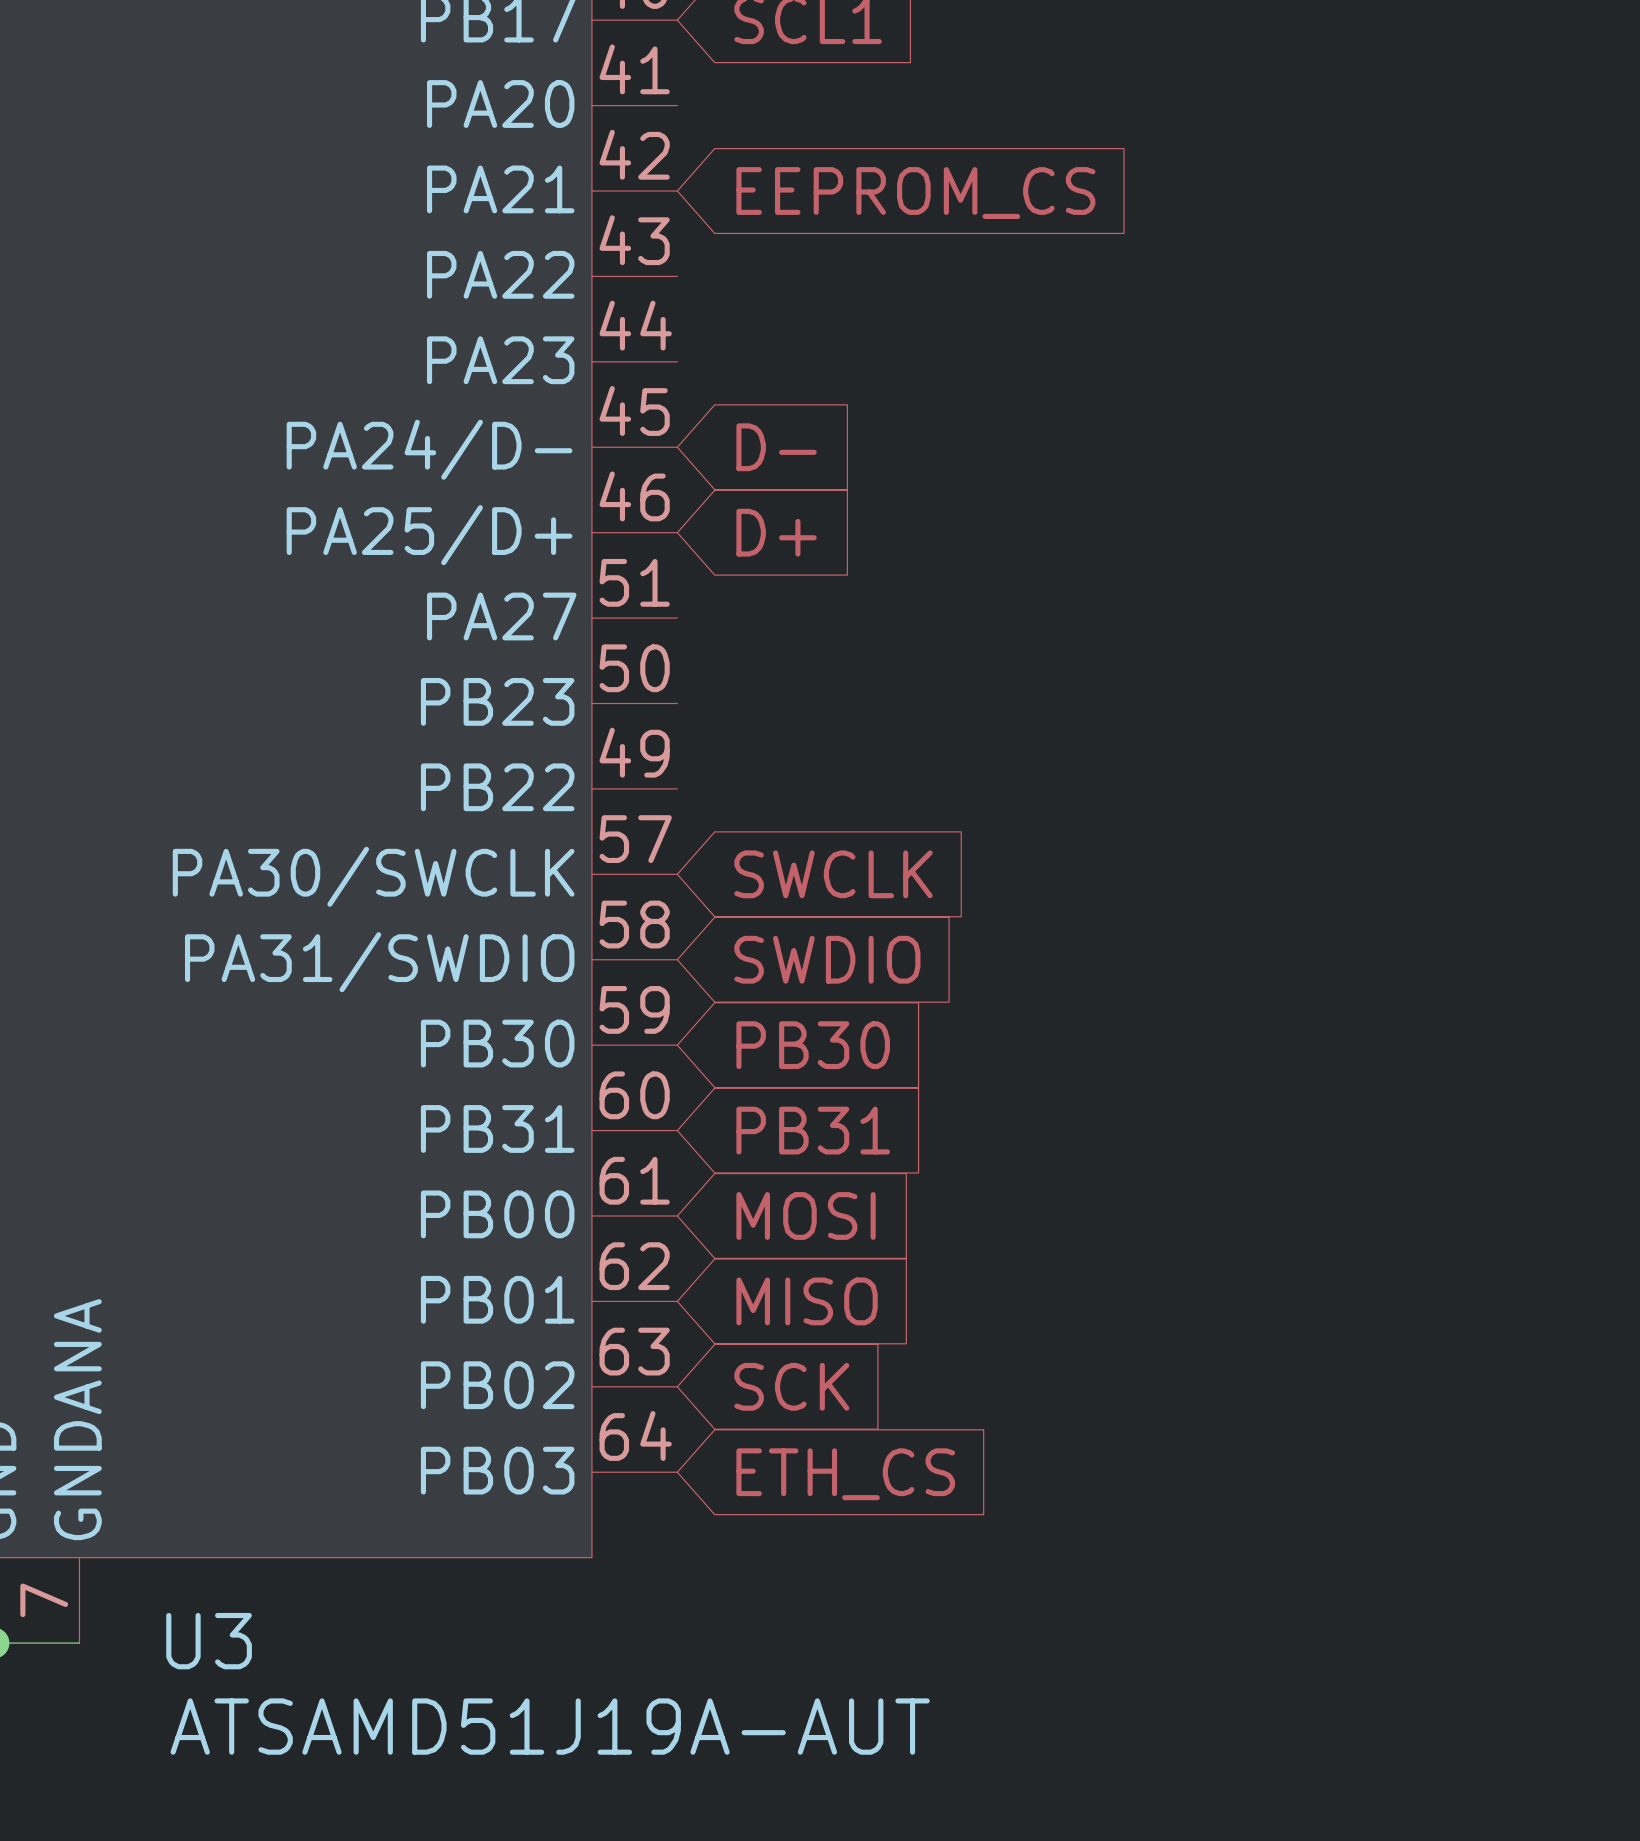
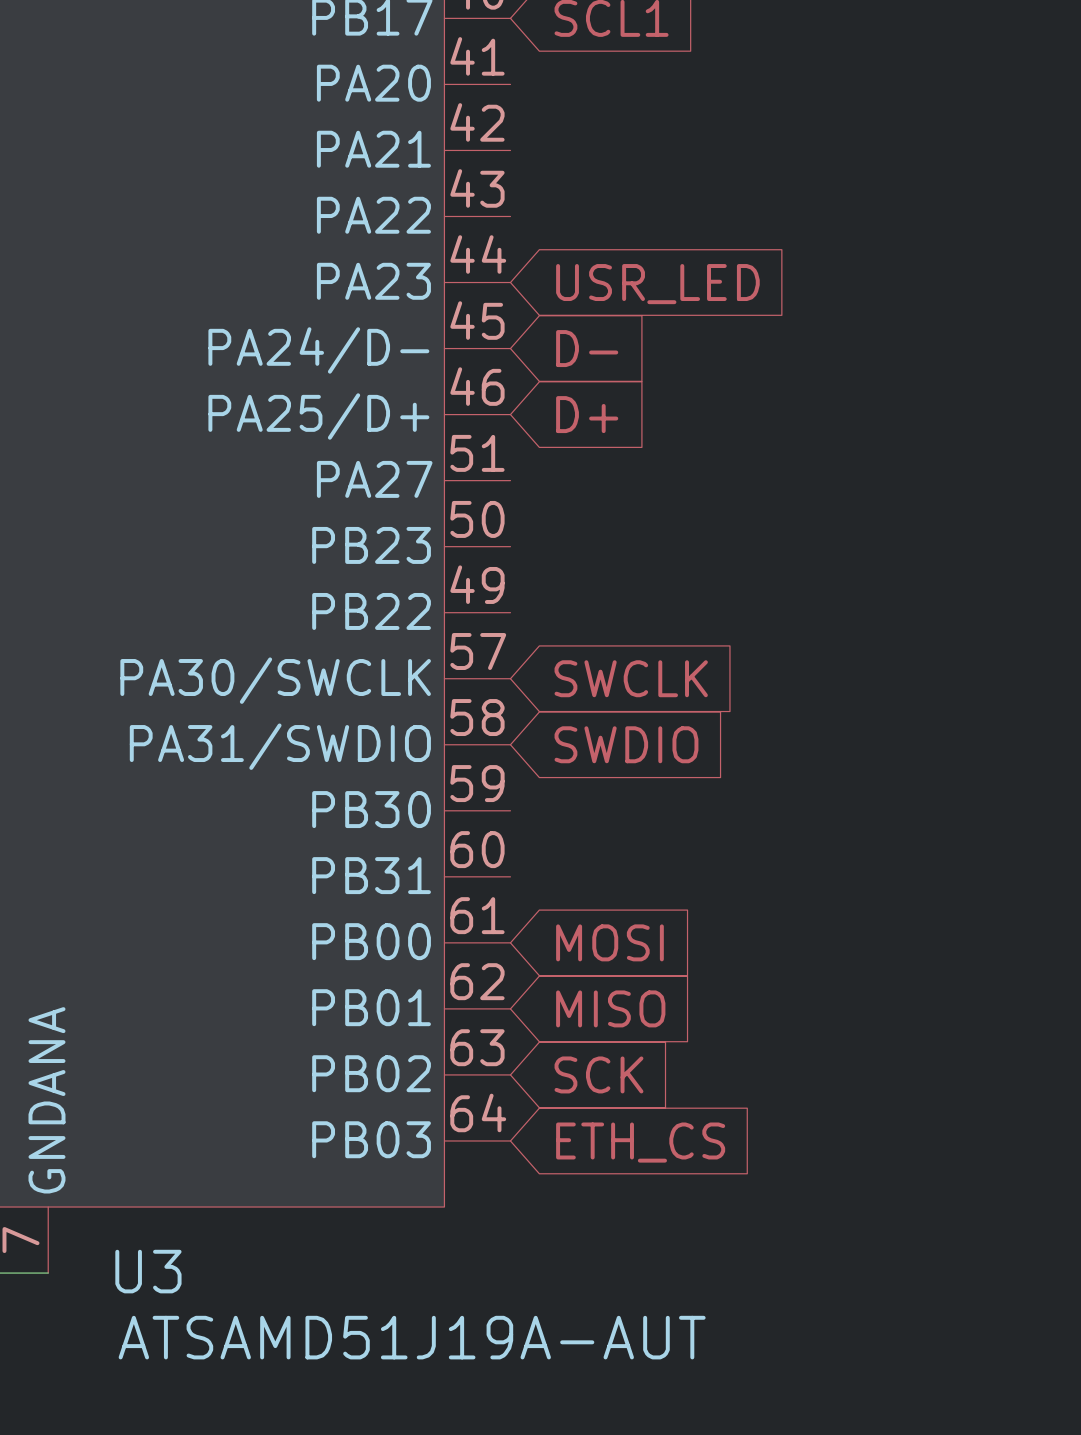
global label: EEPROM_CS (915, 193) -> none
global label: none -> USR_LED (657, 284)
global label: PB30 (813, 1045) -> none
global label: PB31 (813, 1130) -> none

